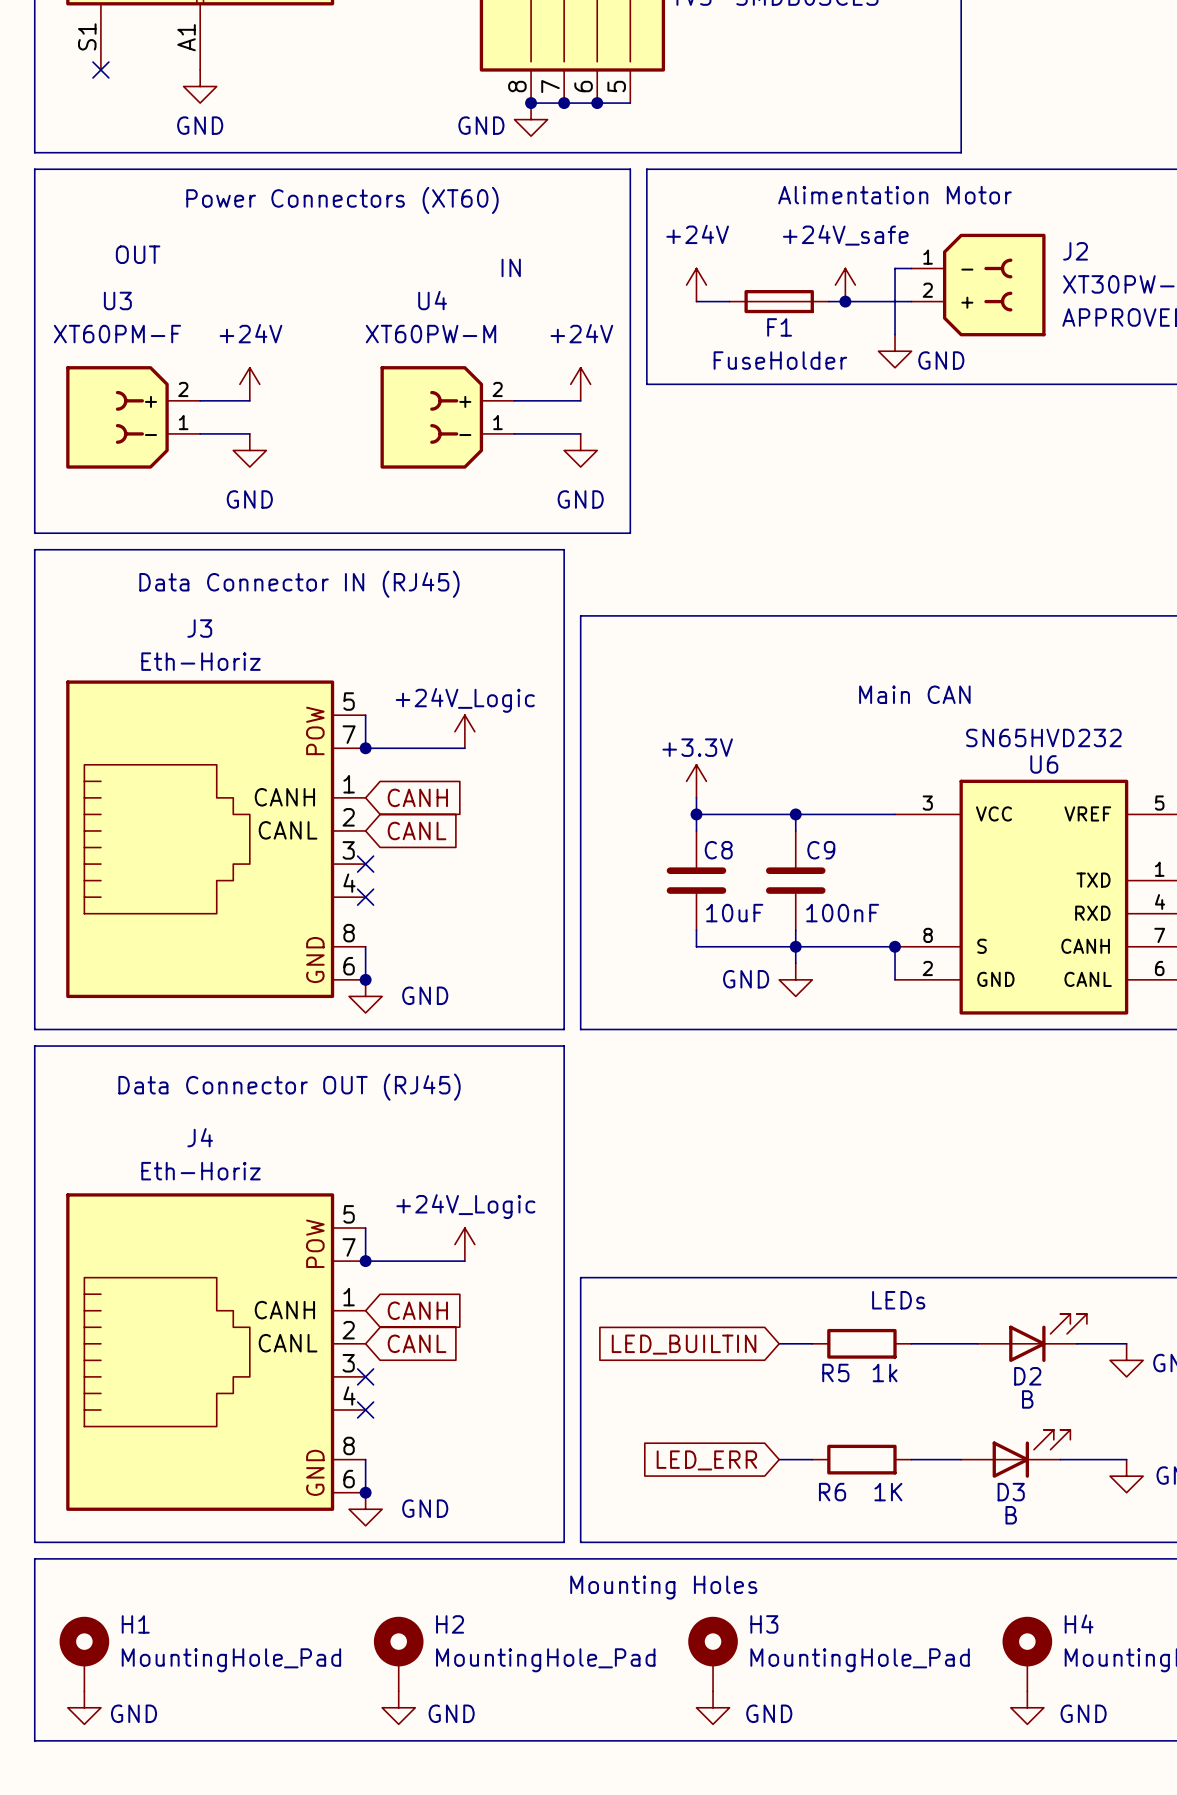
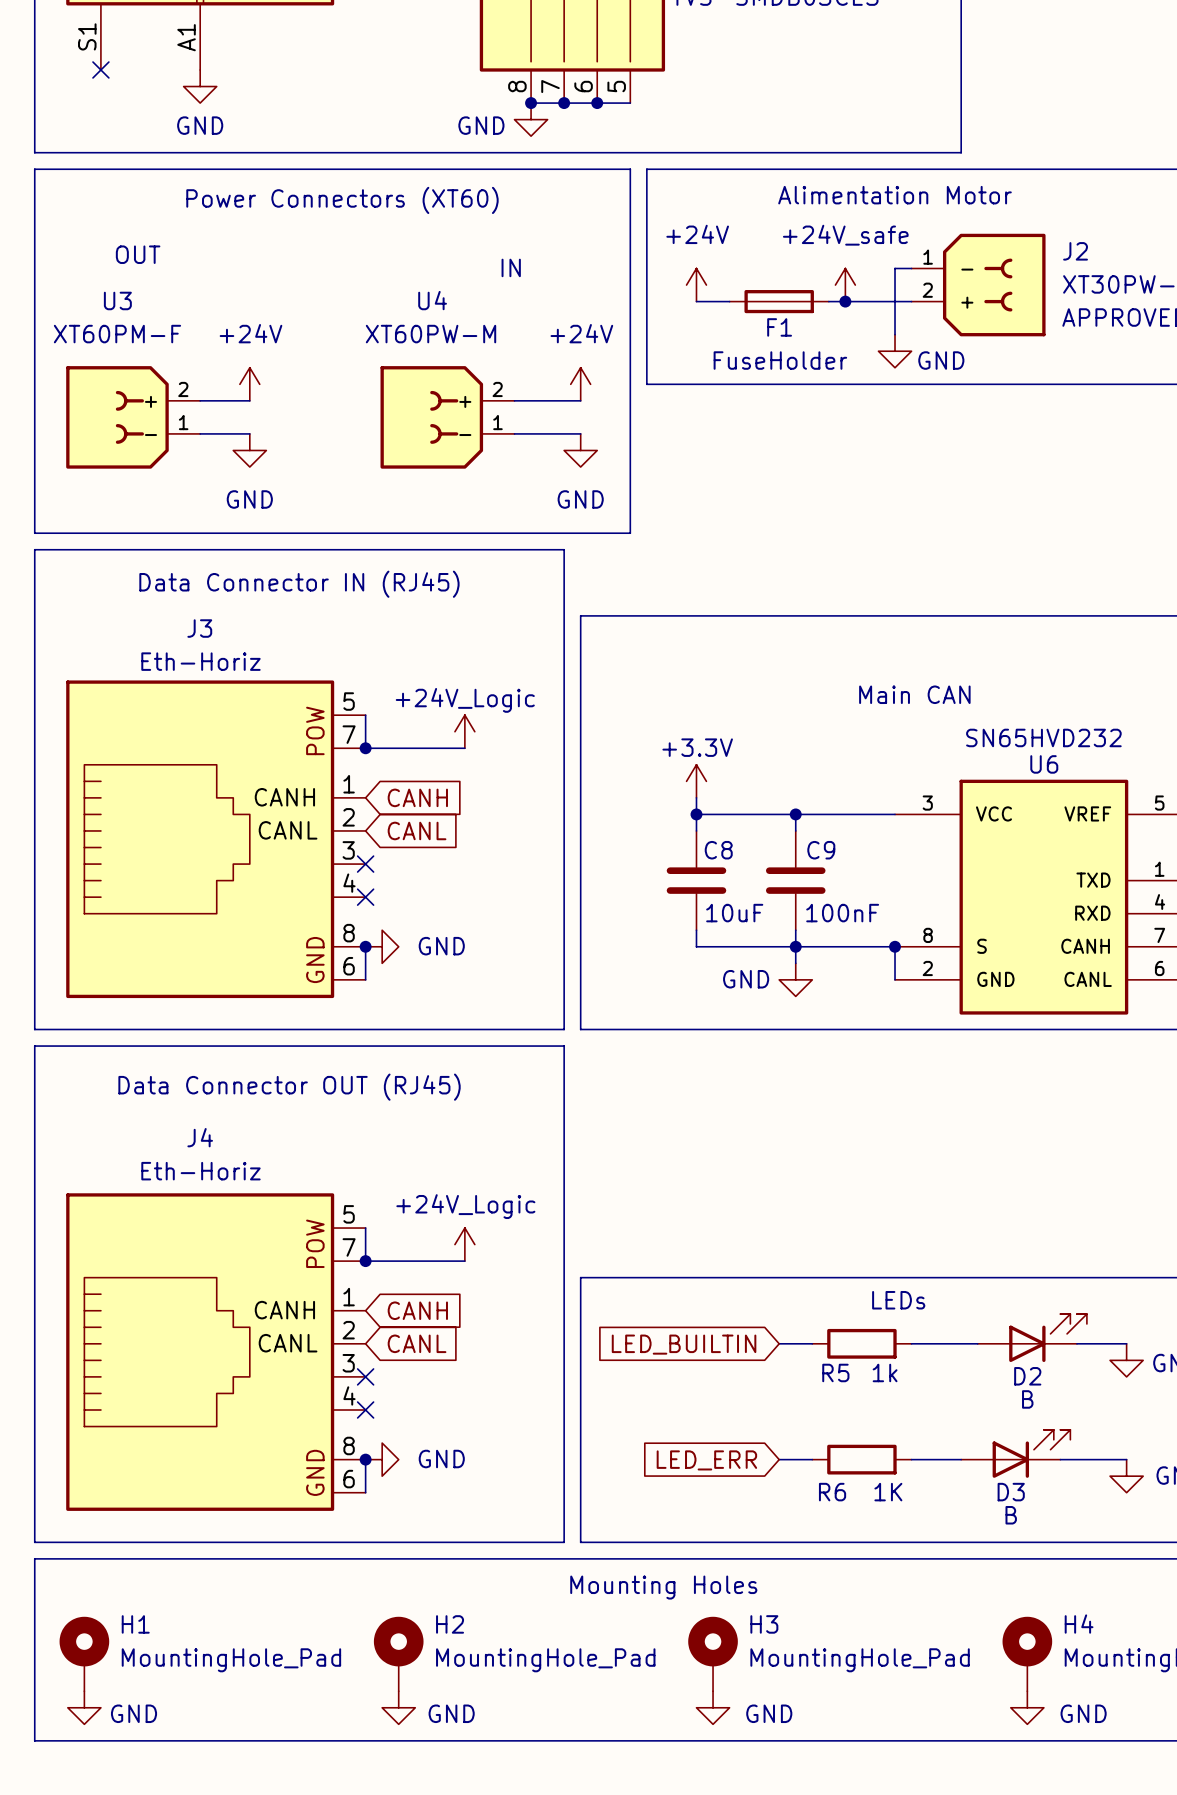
junction position: (365, 979) -> (365, 946)
power symbol rotation: 0° (365, 996) -> 90° counterclockwise (382, 946)
power symbol position: GND (365, 996) -> GND (382, 946)
junction position: (365, 1492) -> (365, 1459)
power symbol rotation: 0° (365, 1509) -> 90° counterclockwise (382, 1459)
power symbol position: GND (365, 1509) -> GND (382, 1459)

